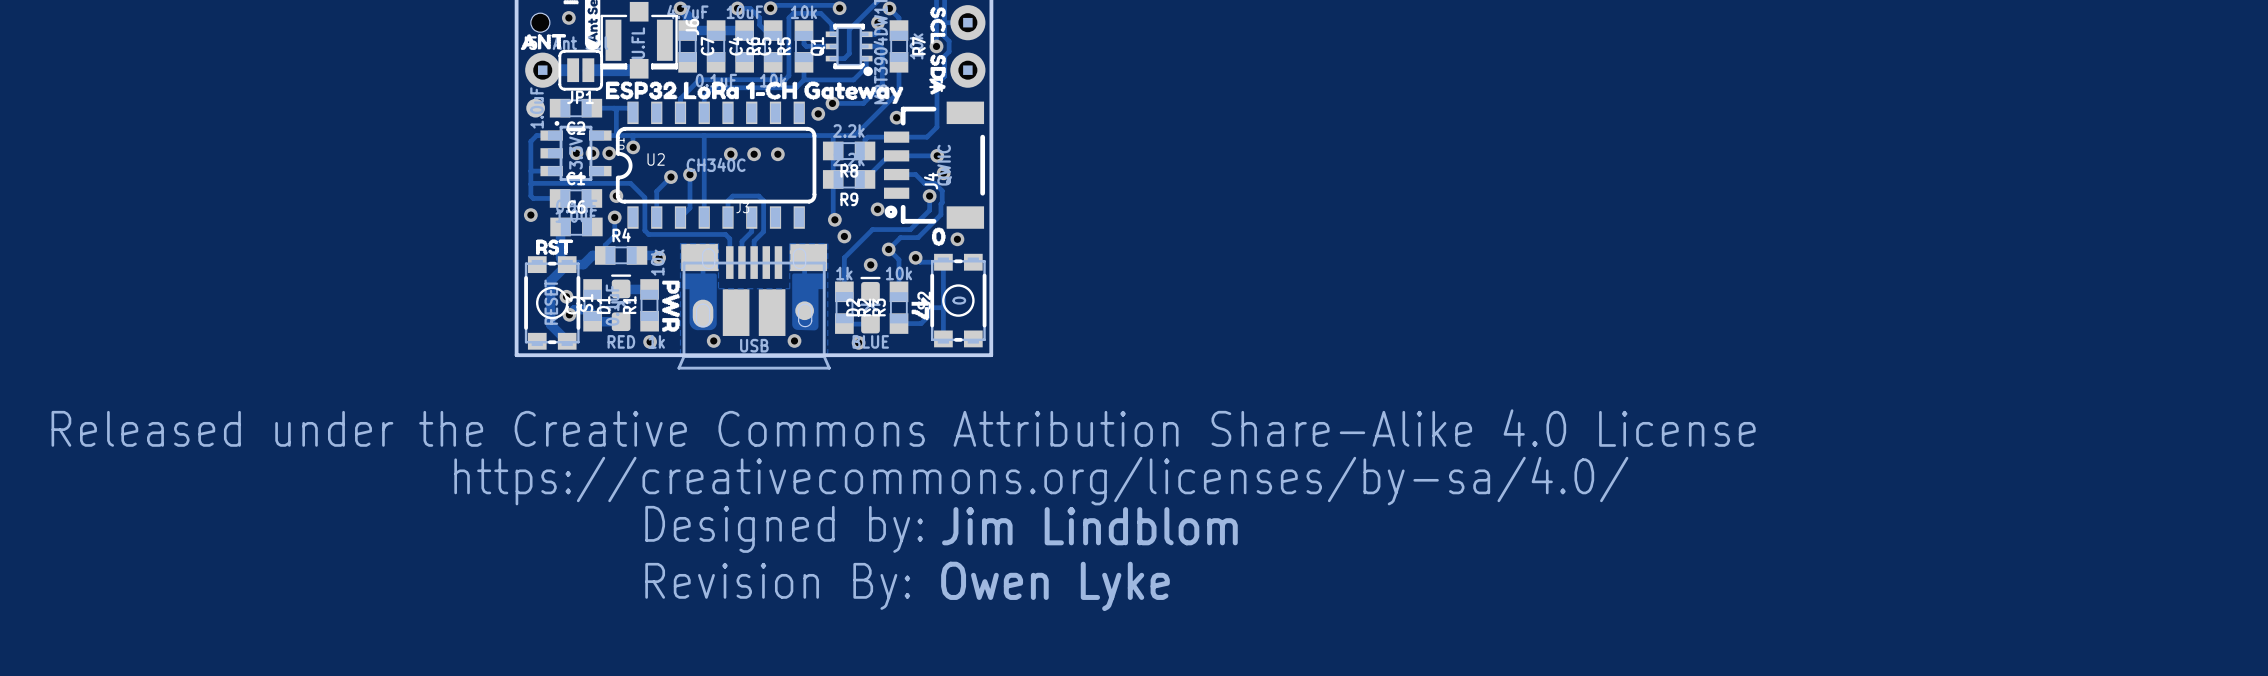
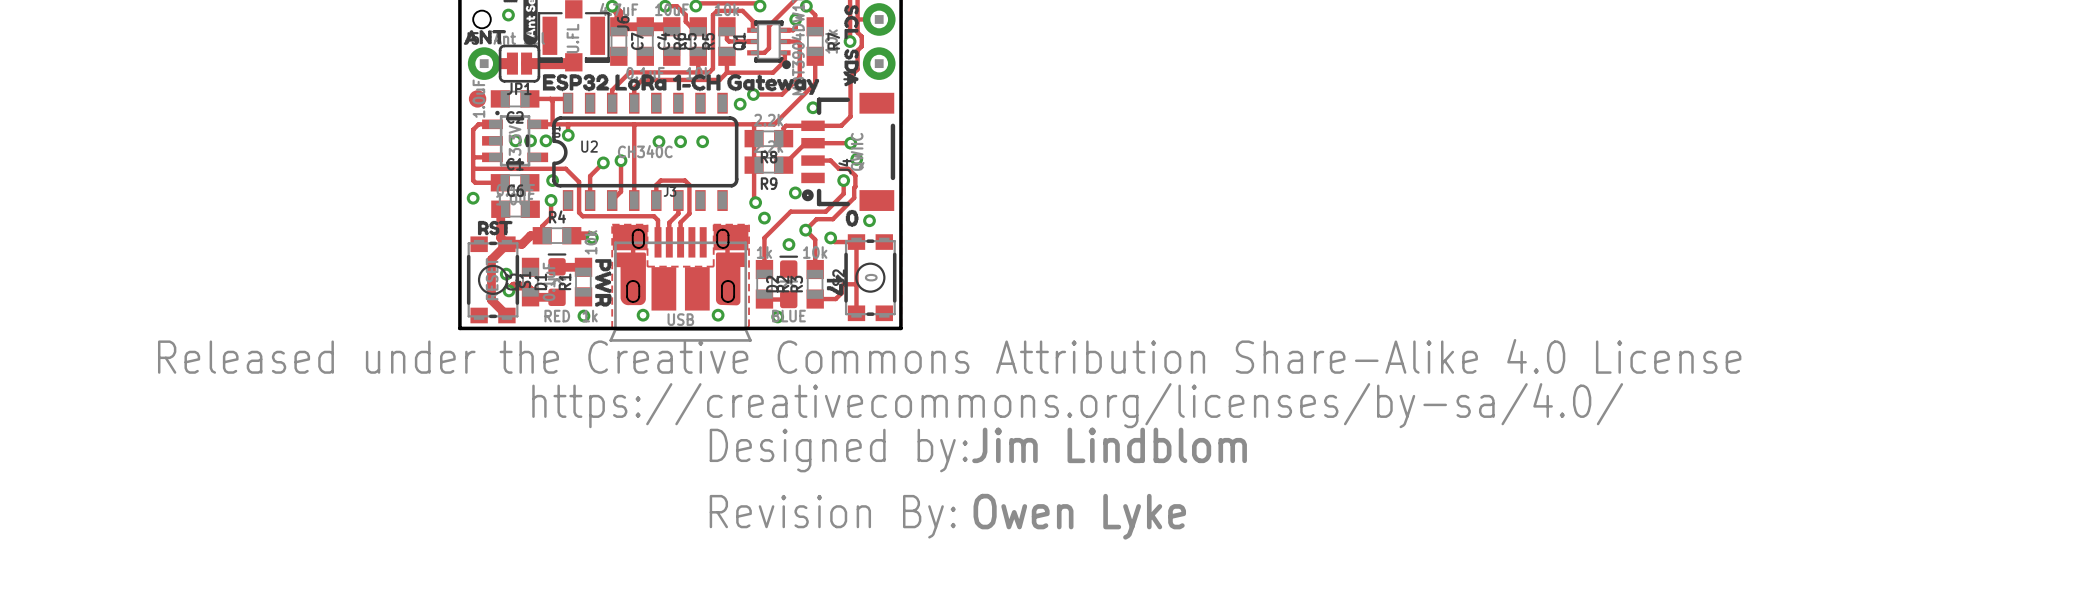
drawing position: (903, 481) -> (949, 405)
text position: Jim Lindblom (1089, 526) -> Jim Lindblom (1109, 445)
drawing position: (777, 586) -> (832, 516)
text position: Owen Lyke (1055, 586) -> Owen Lyke (1079, 516)

